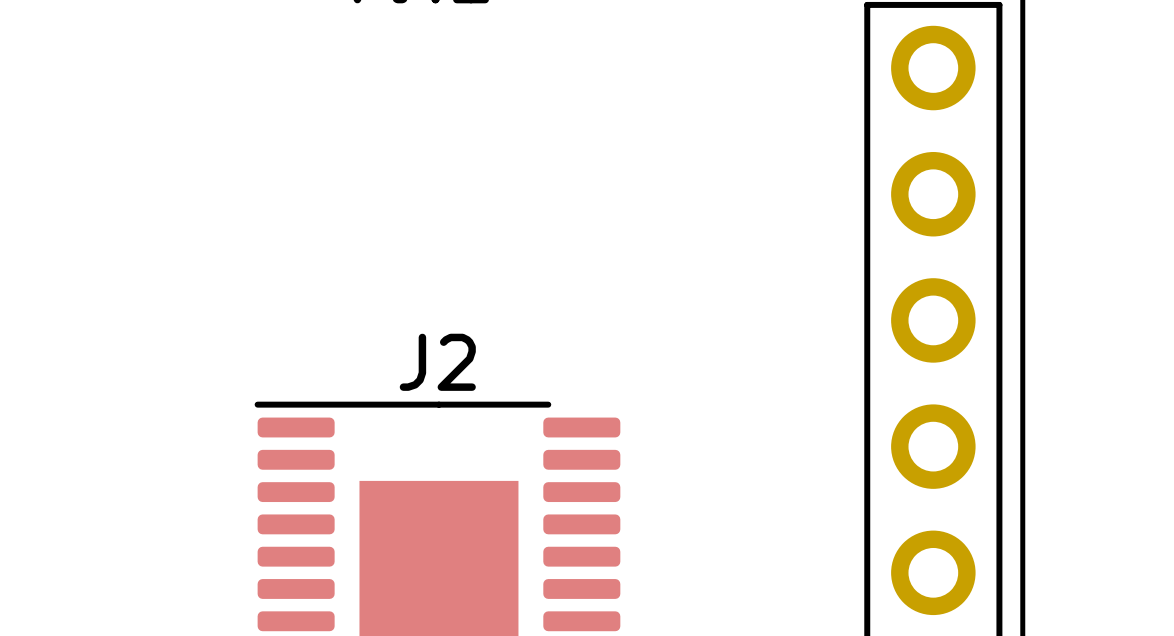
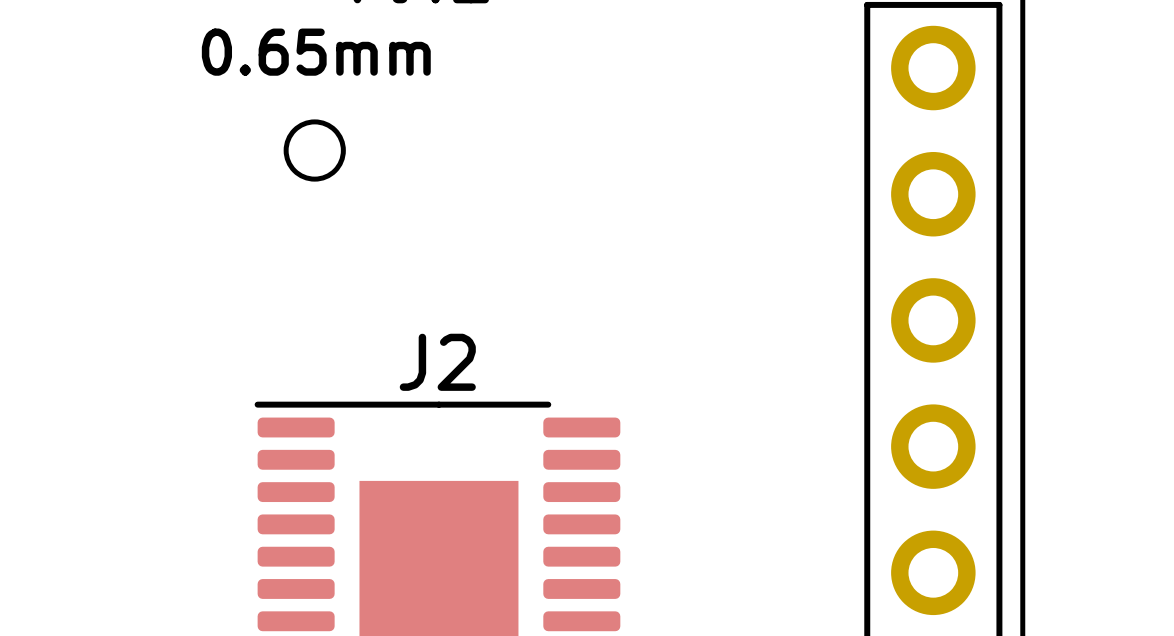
text: none -> 0.65mm (316, 52)
round board edge: none -> [283, 119, 346, 182]

